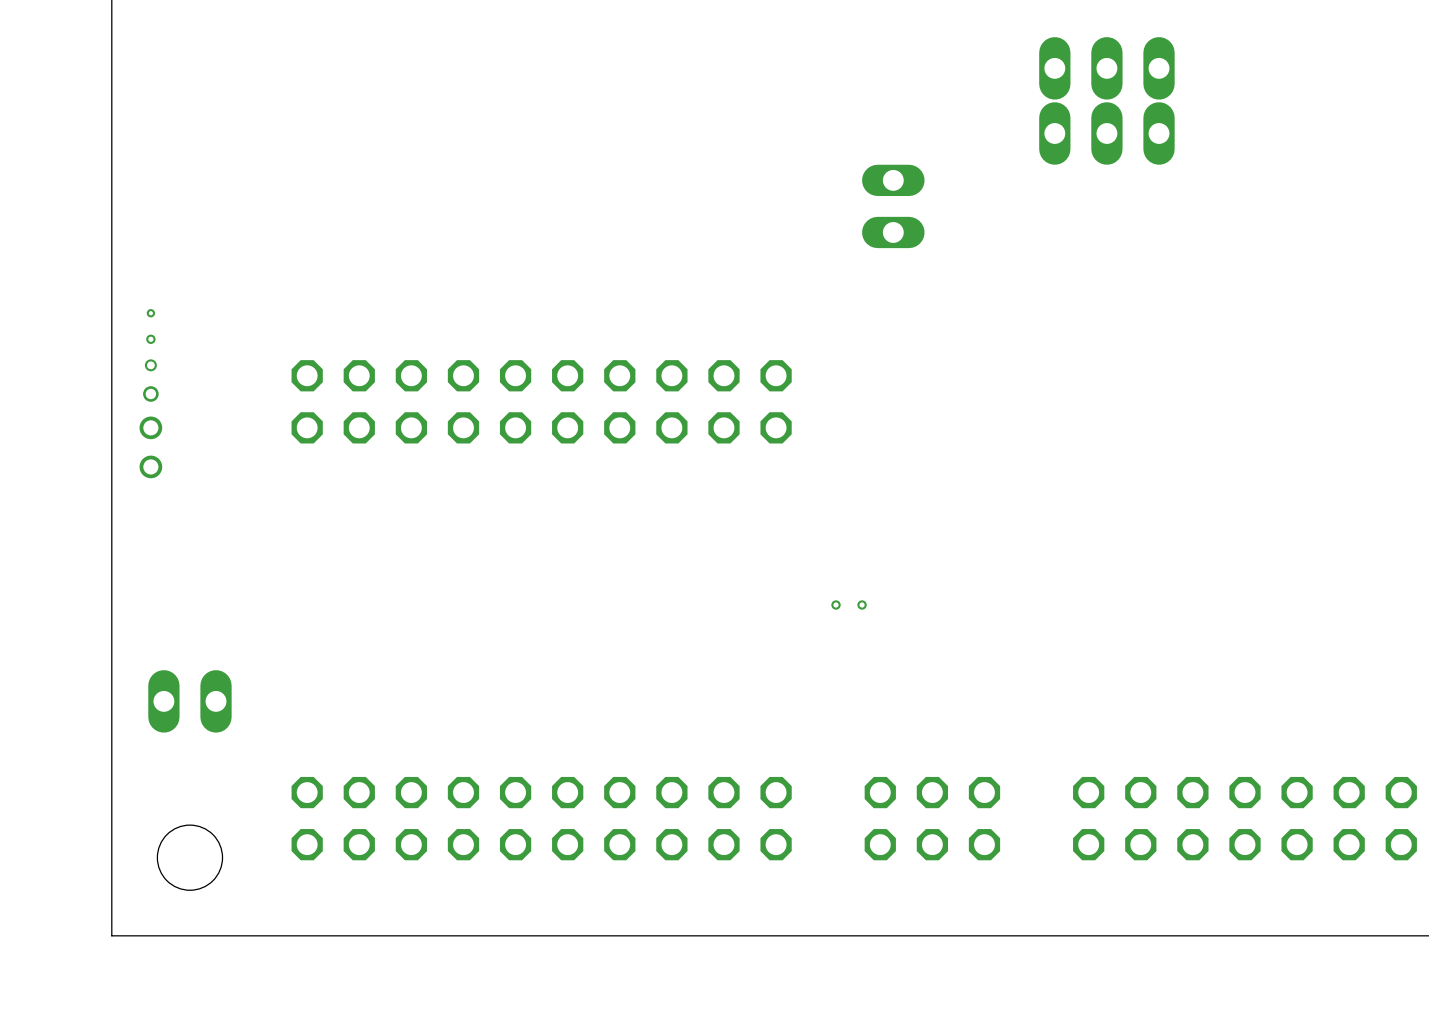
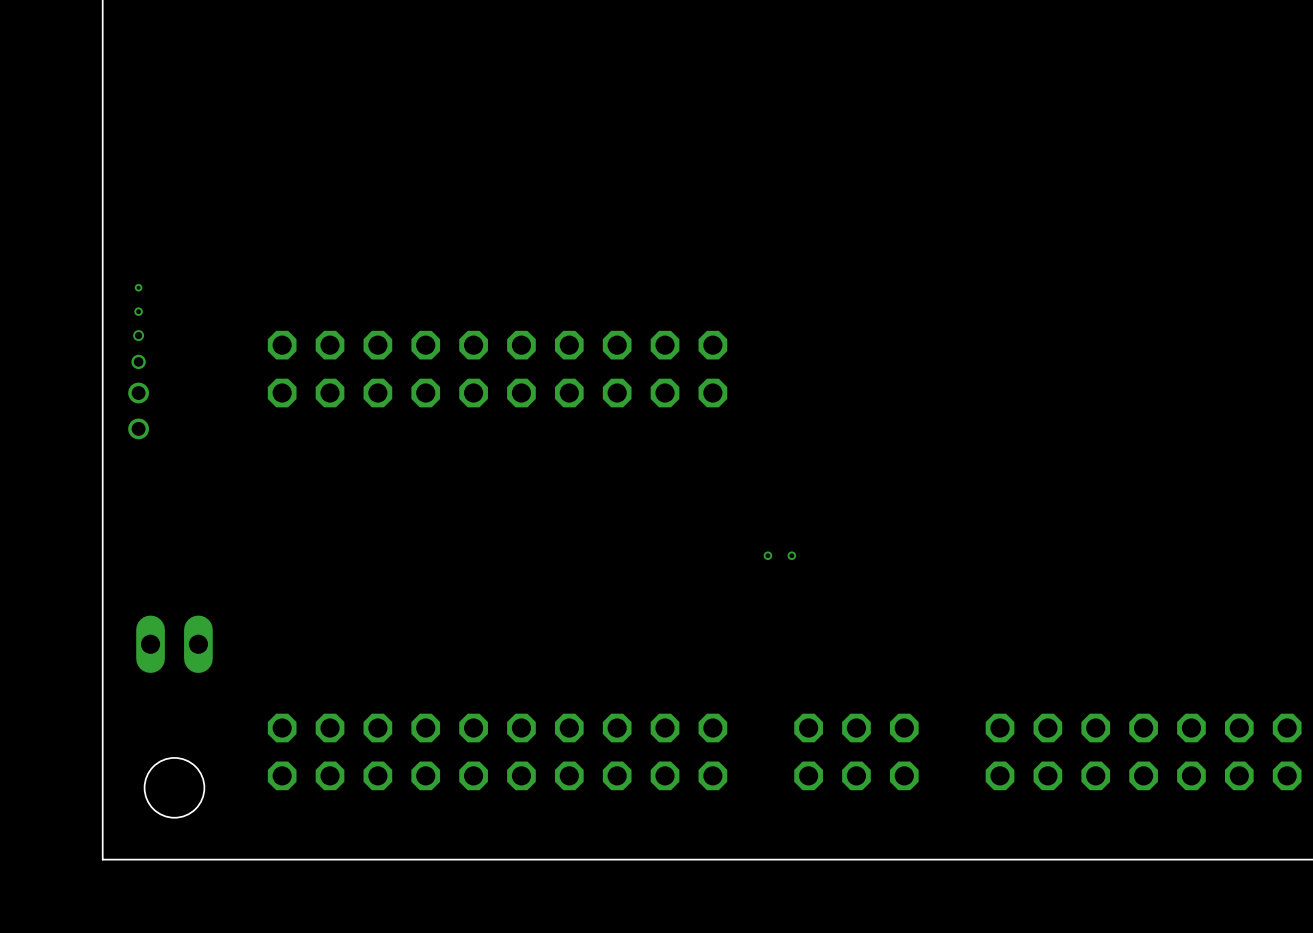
part: (1106, 68) -> none
part: (1106, 133) -> none
part: (893, 206) -> none

